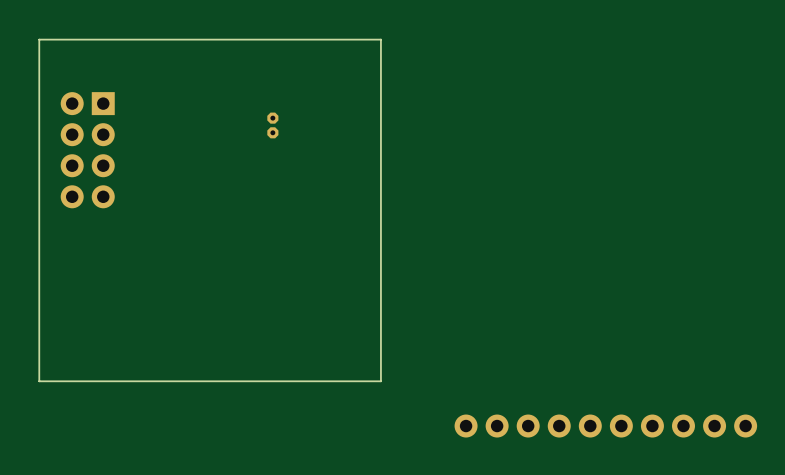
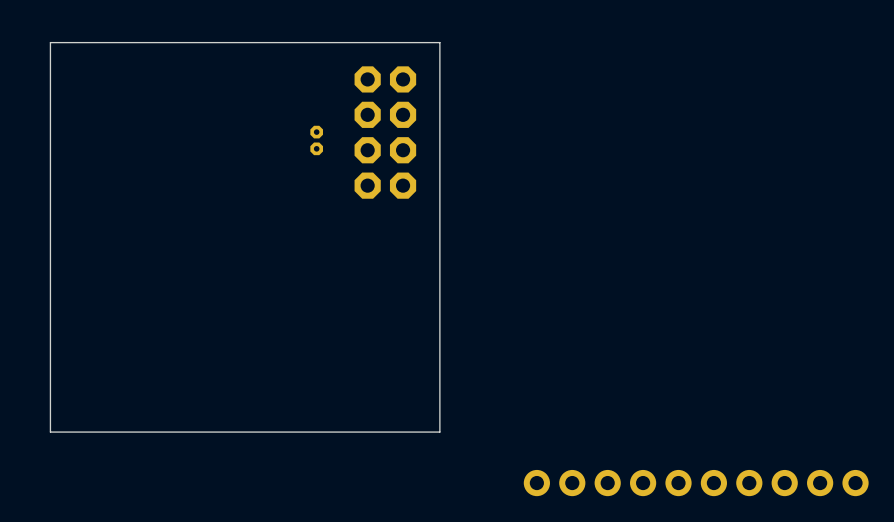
part: none -> (385, 132)
part: (87, 150) -> none

